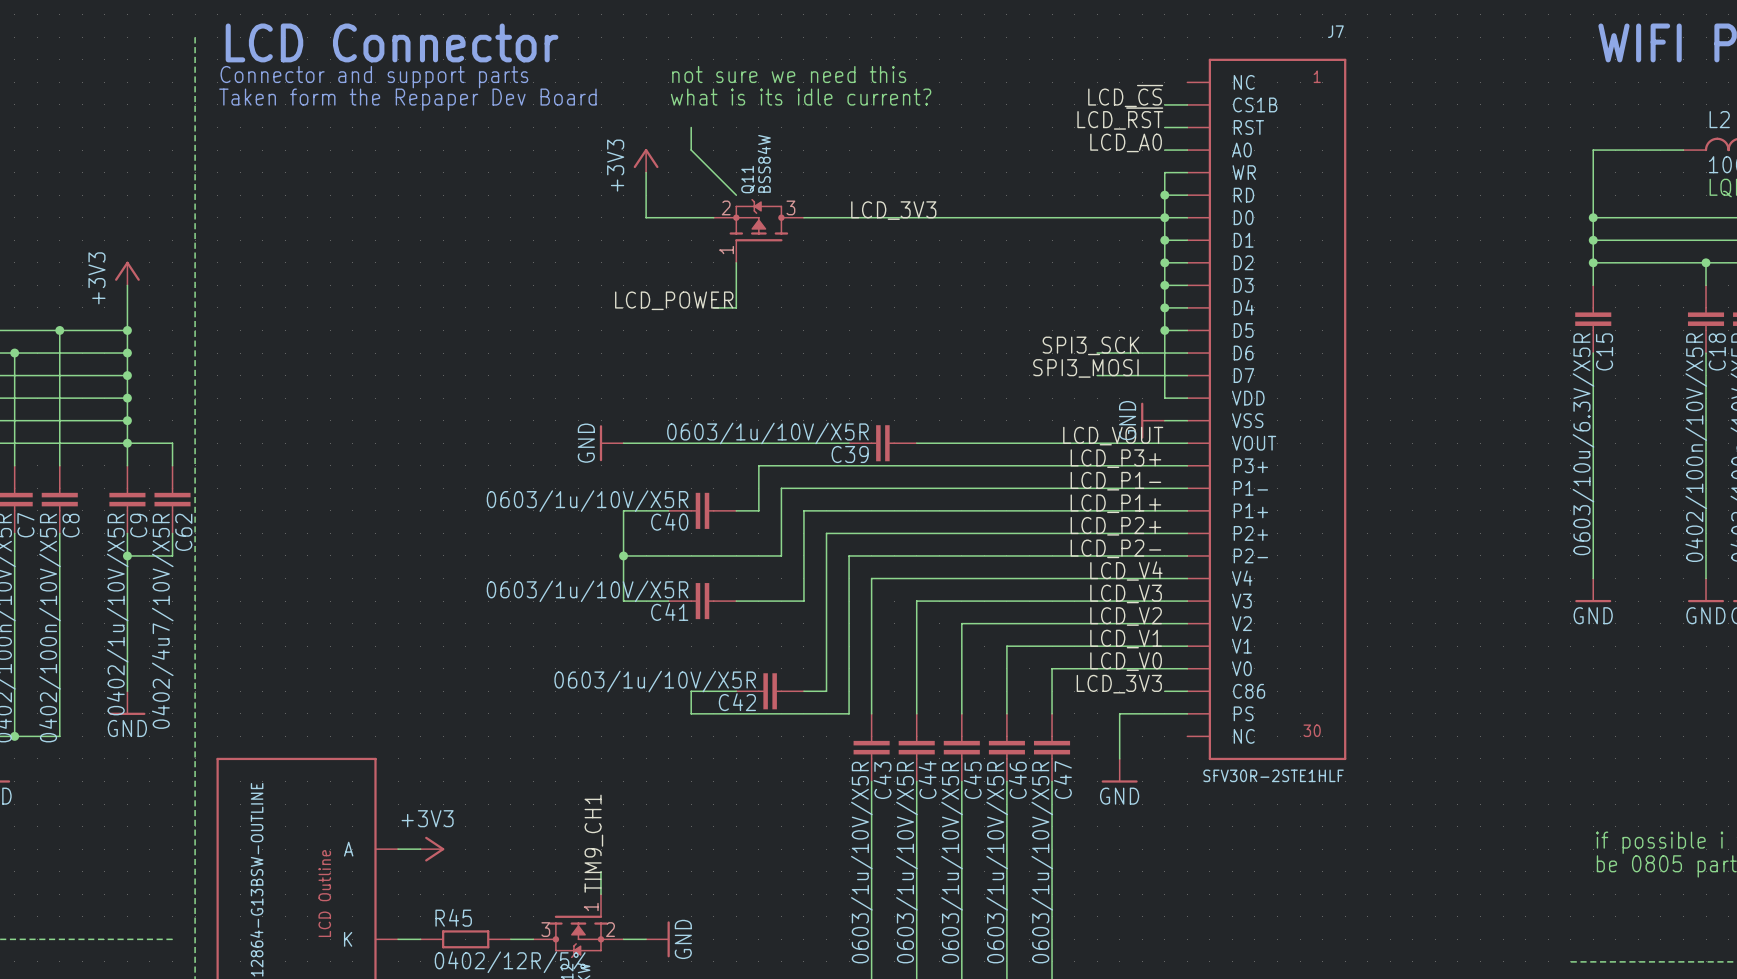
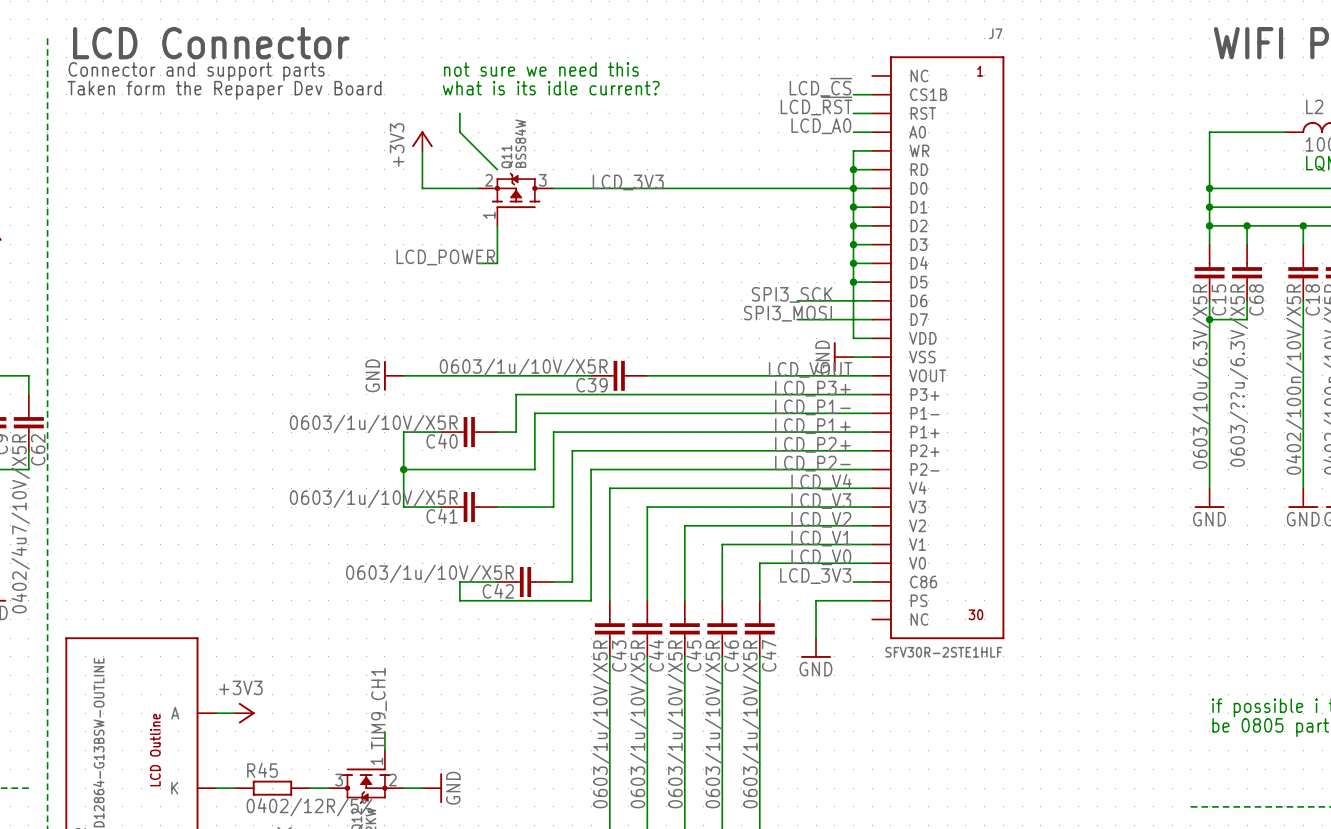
wire: none -> (1247, 225) (1247, 244)
junction: none -> (1247, 225)
C68: none -> 0603/??u/6.3V/X5R (1247, 272)
wire: none -> (1247, 300) (1247, 319) (1209, 319)
junction: none -> (1209, 319)

